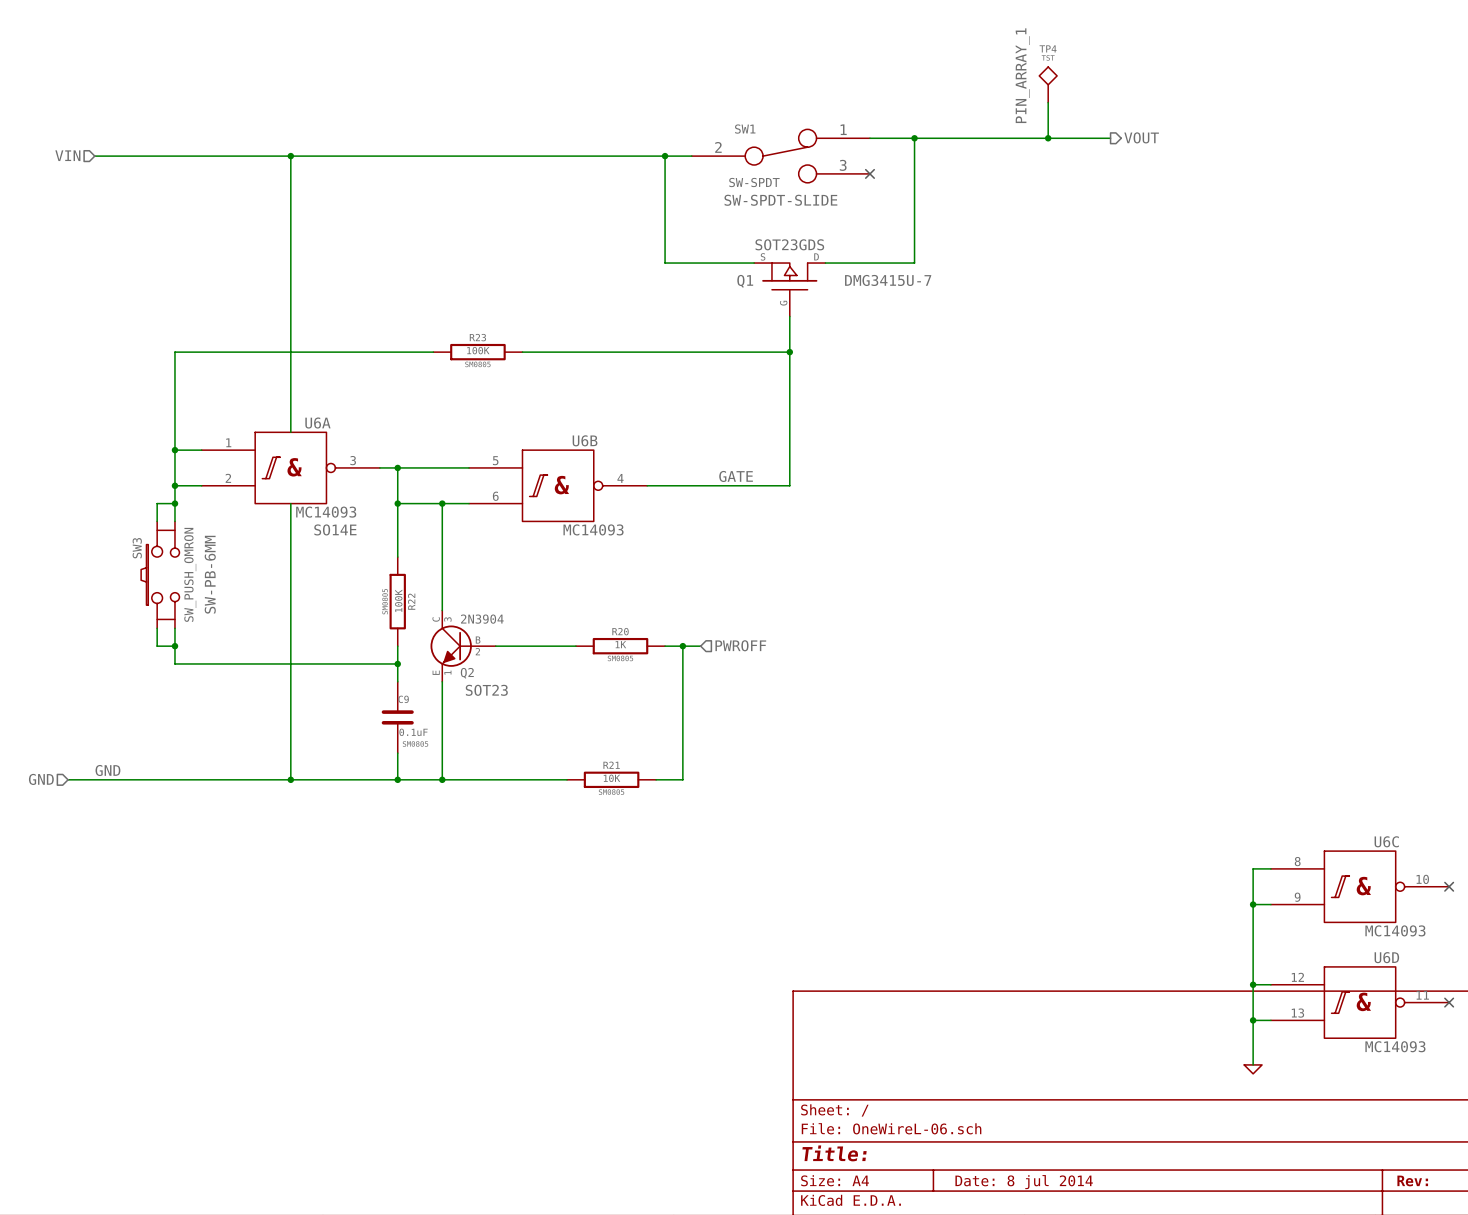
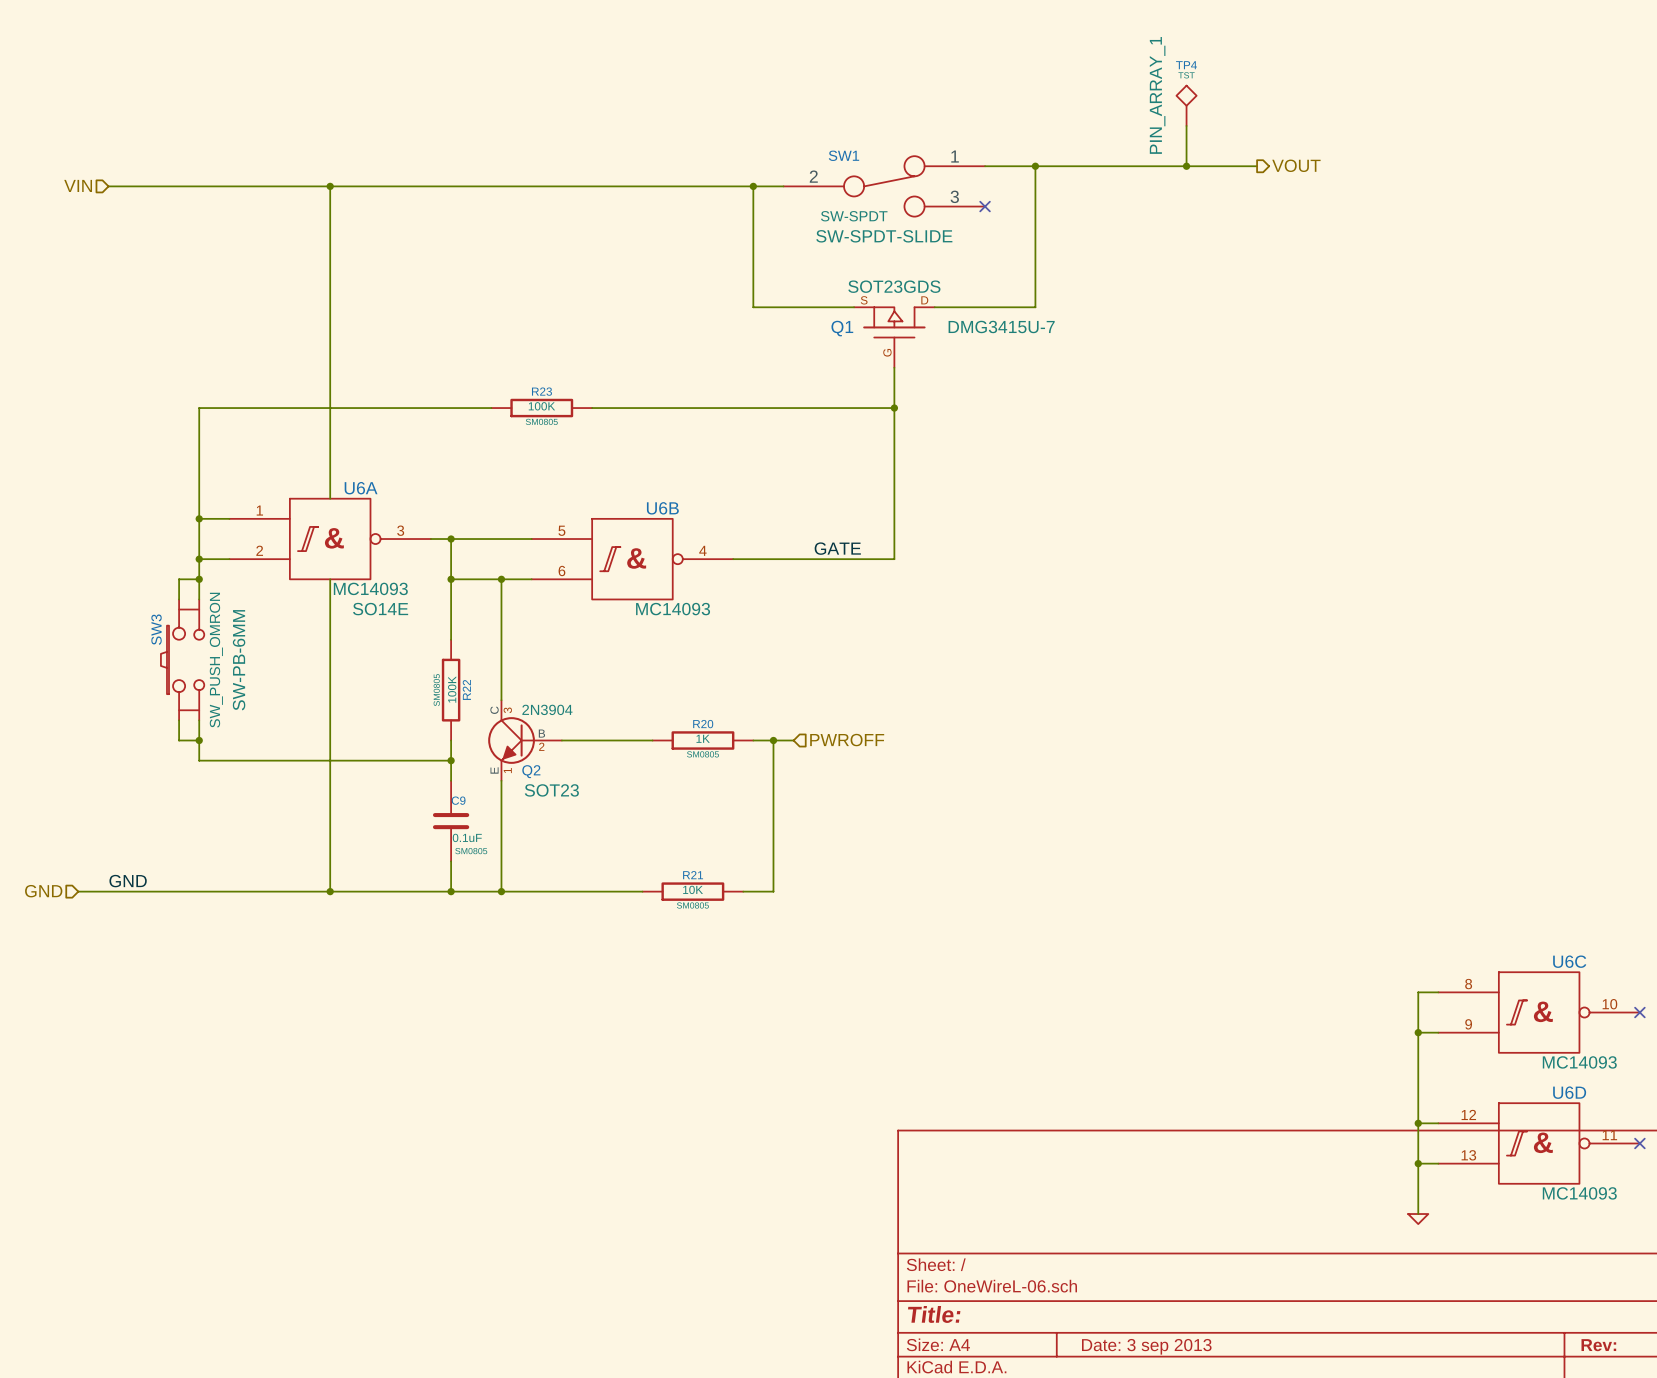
title block: Date: 8 jul 2014 (1024, 1182) -> Date: 3 sep 2013 (1146, 1346)

